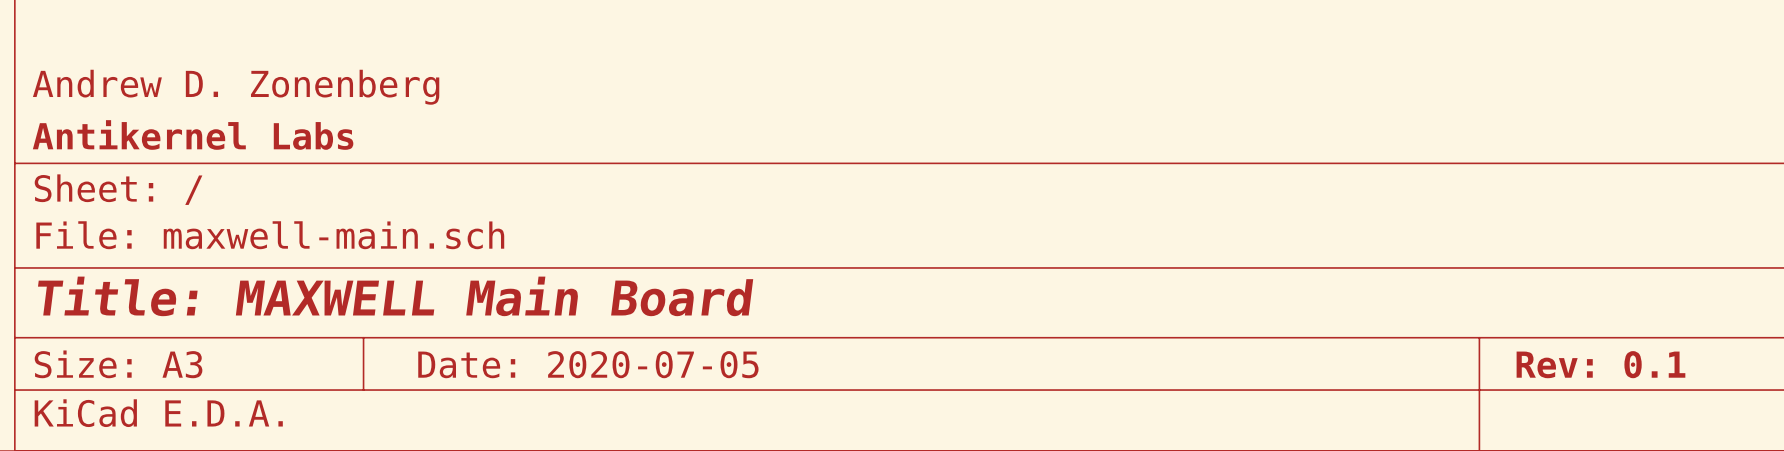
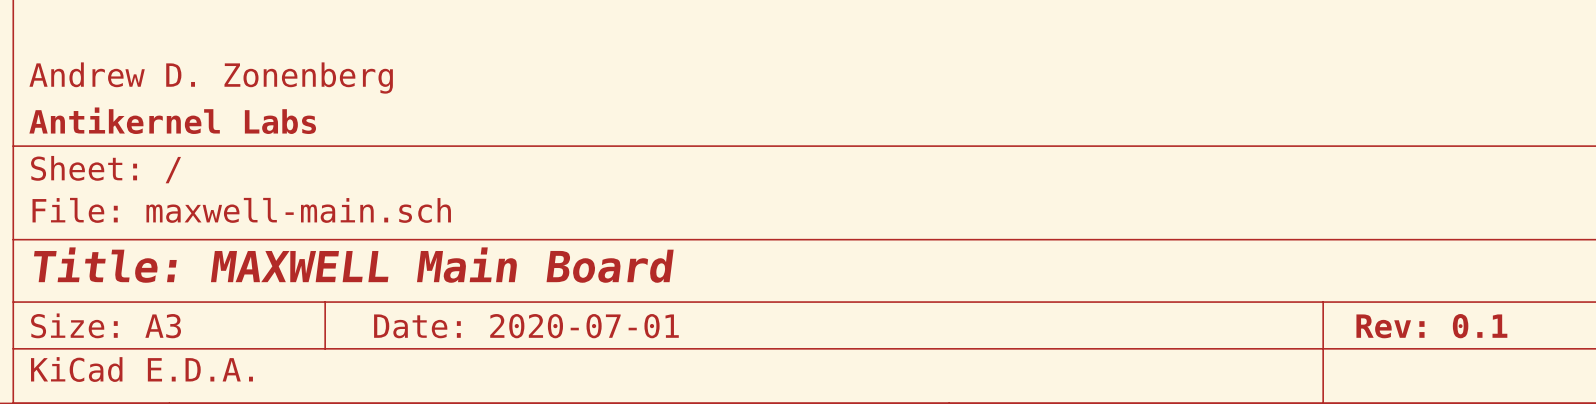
title block: Date: 2020-07-05 (588, 364) -> Date: 2020-07-01 (526, 326)

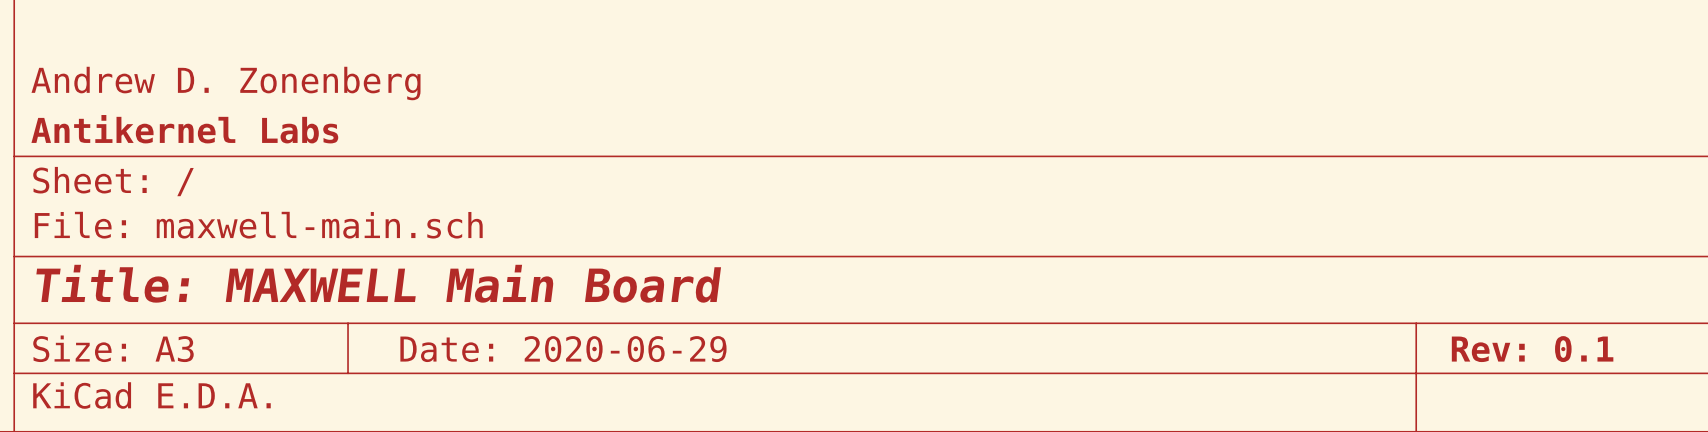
title block: Date: 2020-07-01 (526, 326) -> Date: 2020-06-29 (563, 349)

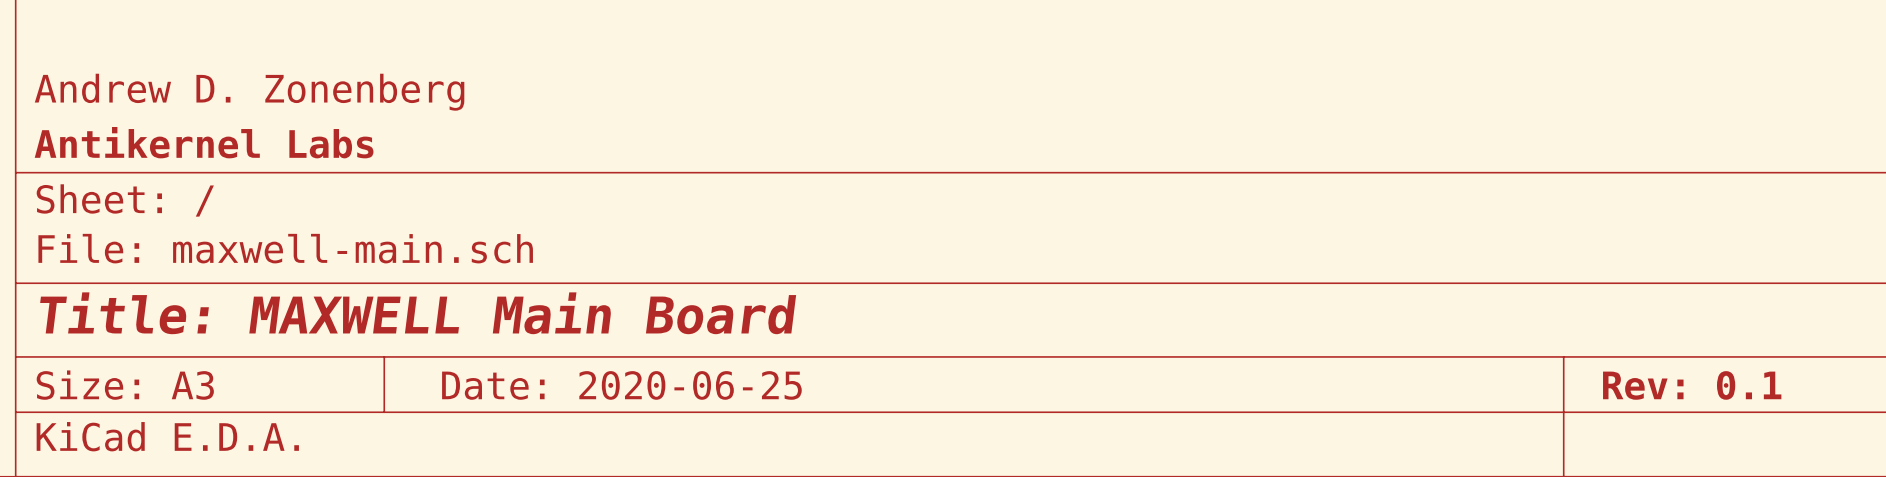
title block: Date: 2020-06-29 (563, 349) -> Date: 2020-06-25 (621, 385)

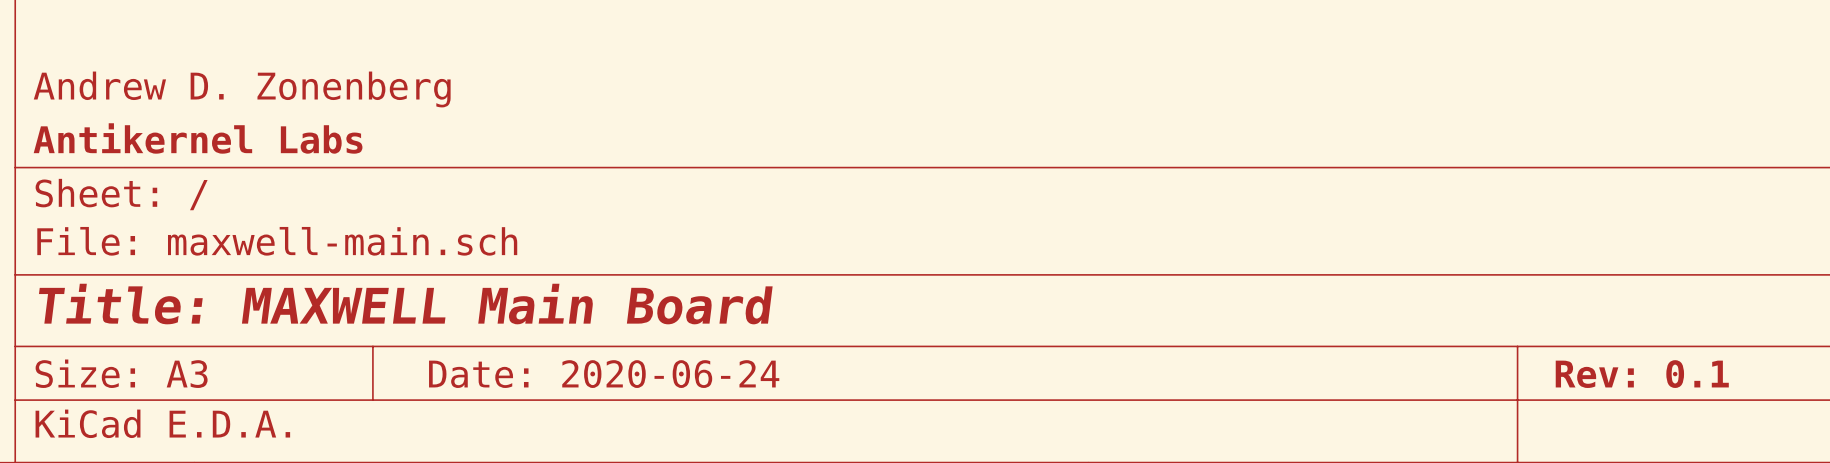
title block: Date: 2020-06-25 (621, 385) -> Date: 2020-06-24 (604, 374)

